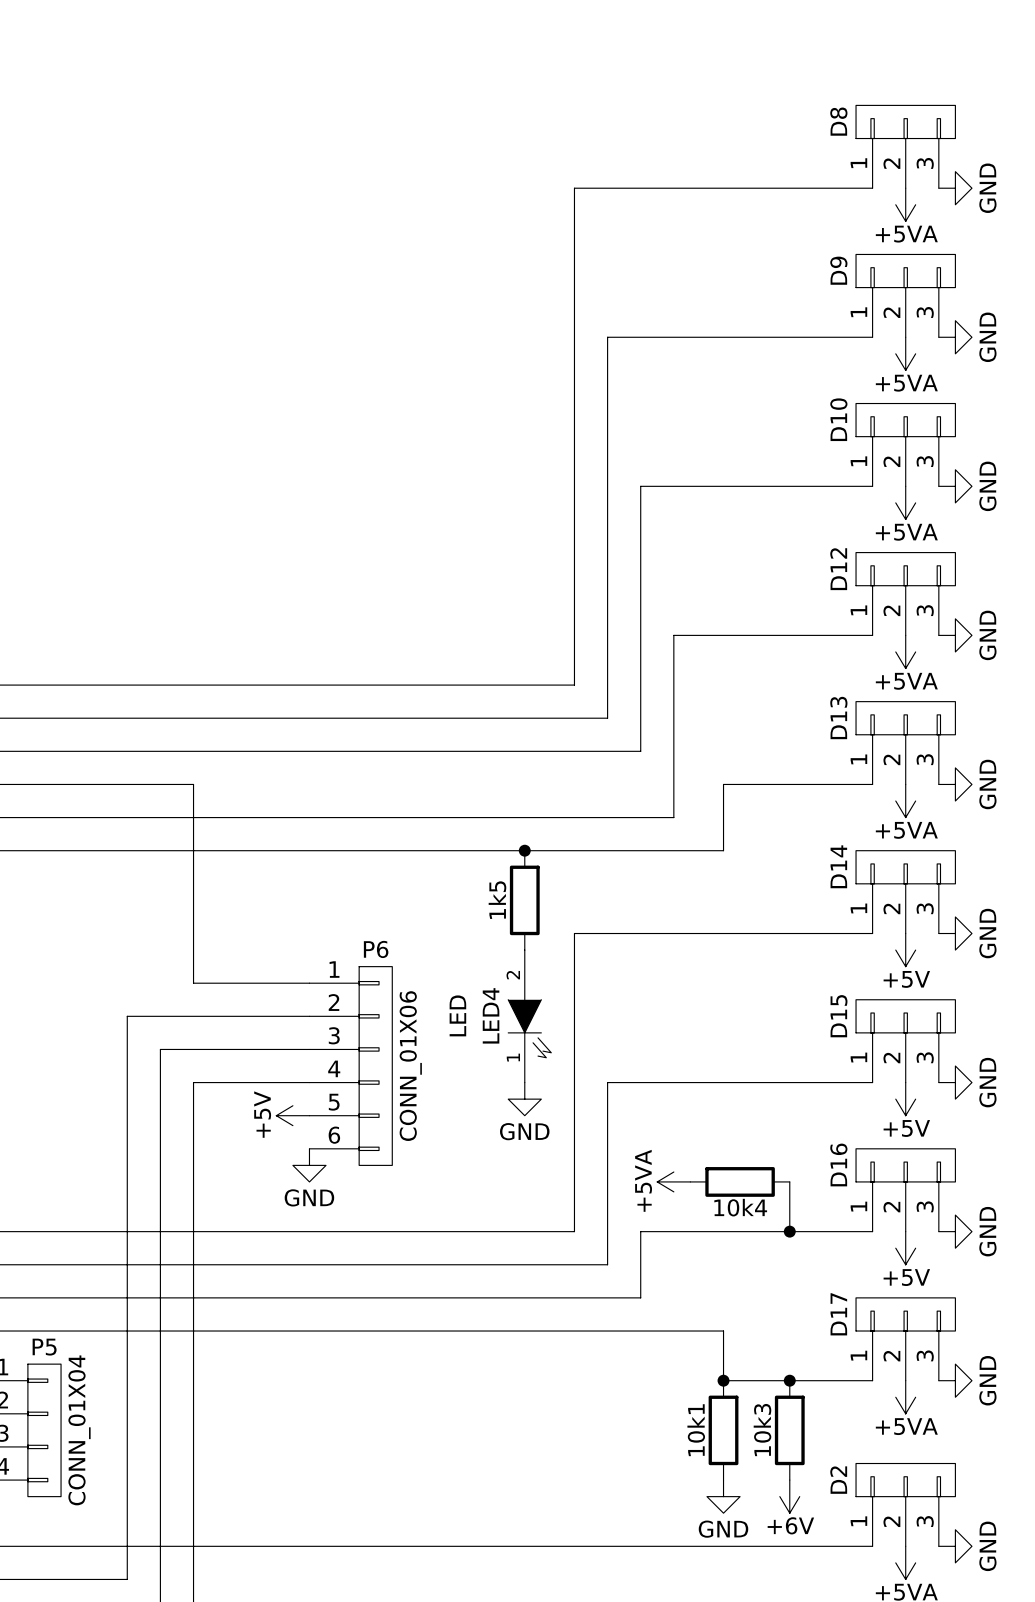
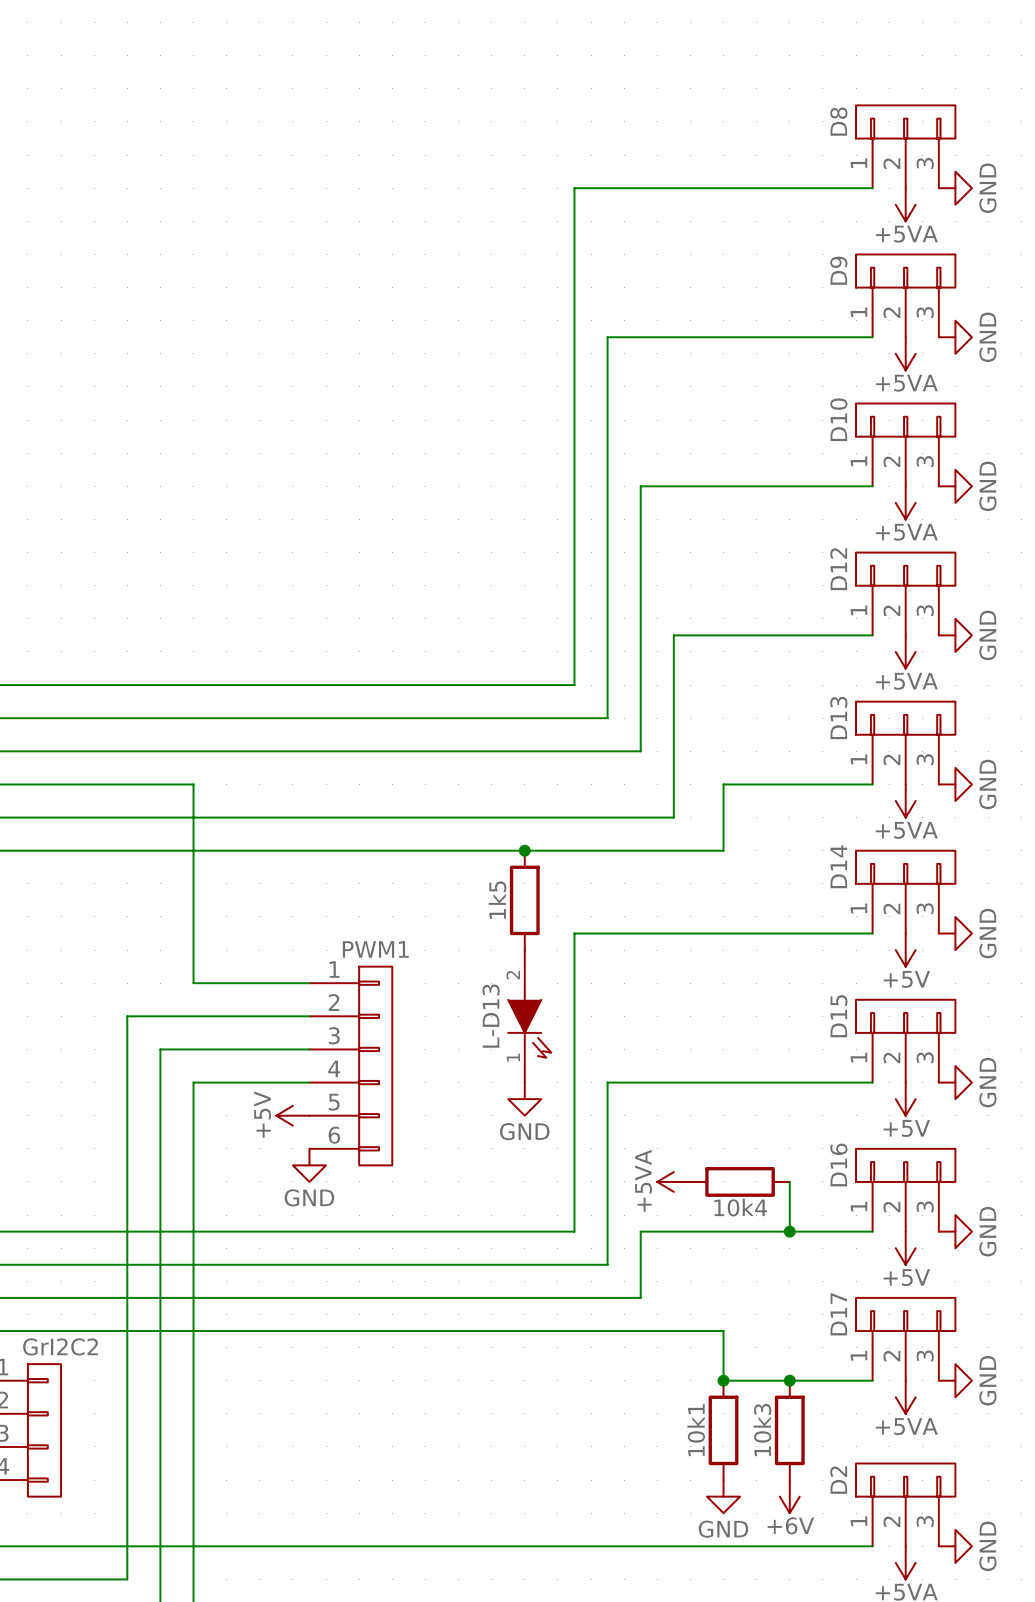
P6 name: P6 (376, 949) -> PWM1 (375, 949)
LED4 value: LED (457, 1015) -> none
LED4 name: LED4 (491, 1015) -> L-D13 (491, 1016)
P6 value: CONN_01X06 (410, 1066) -> none
P5 name: P5 (44, 1347) -> GrI2C2 (60, 1346)
P5 value: CONN_01X04 (79, 1430) -> none

